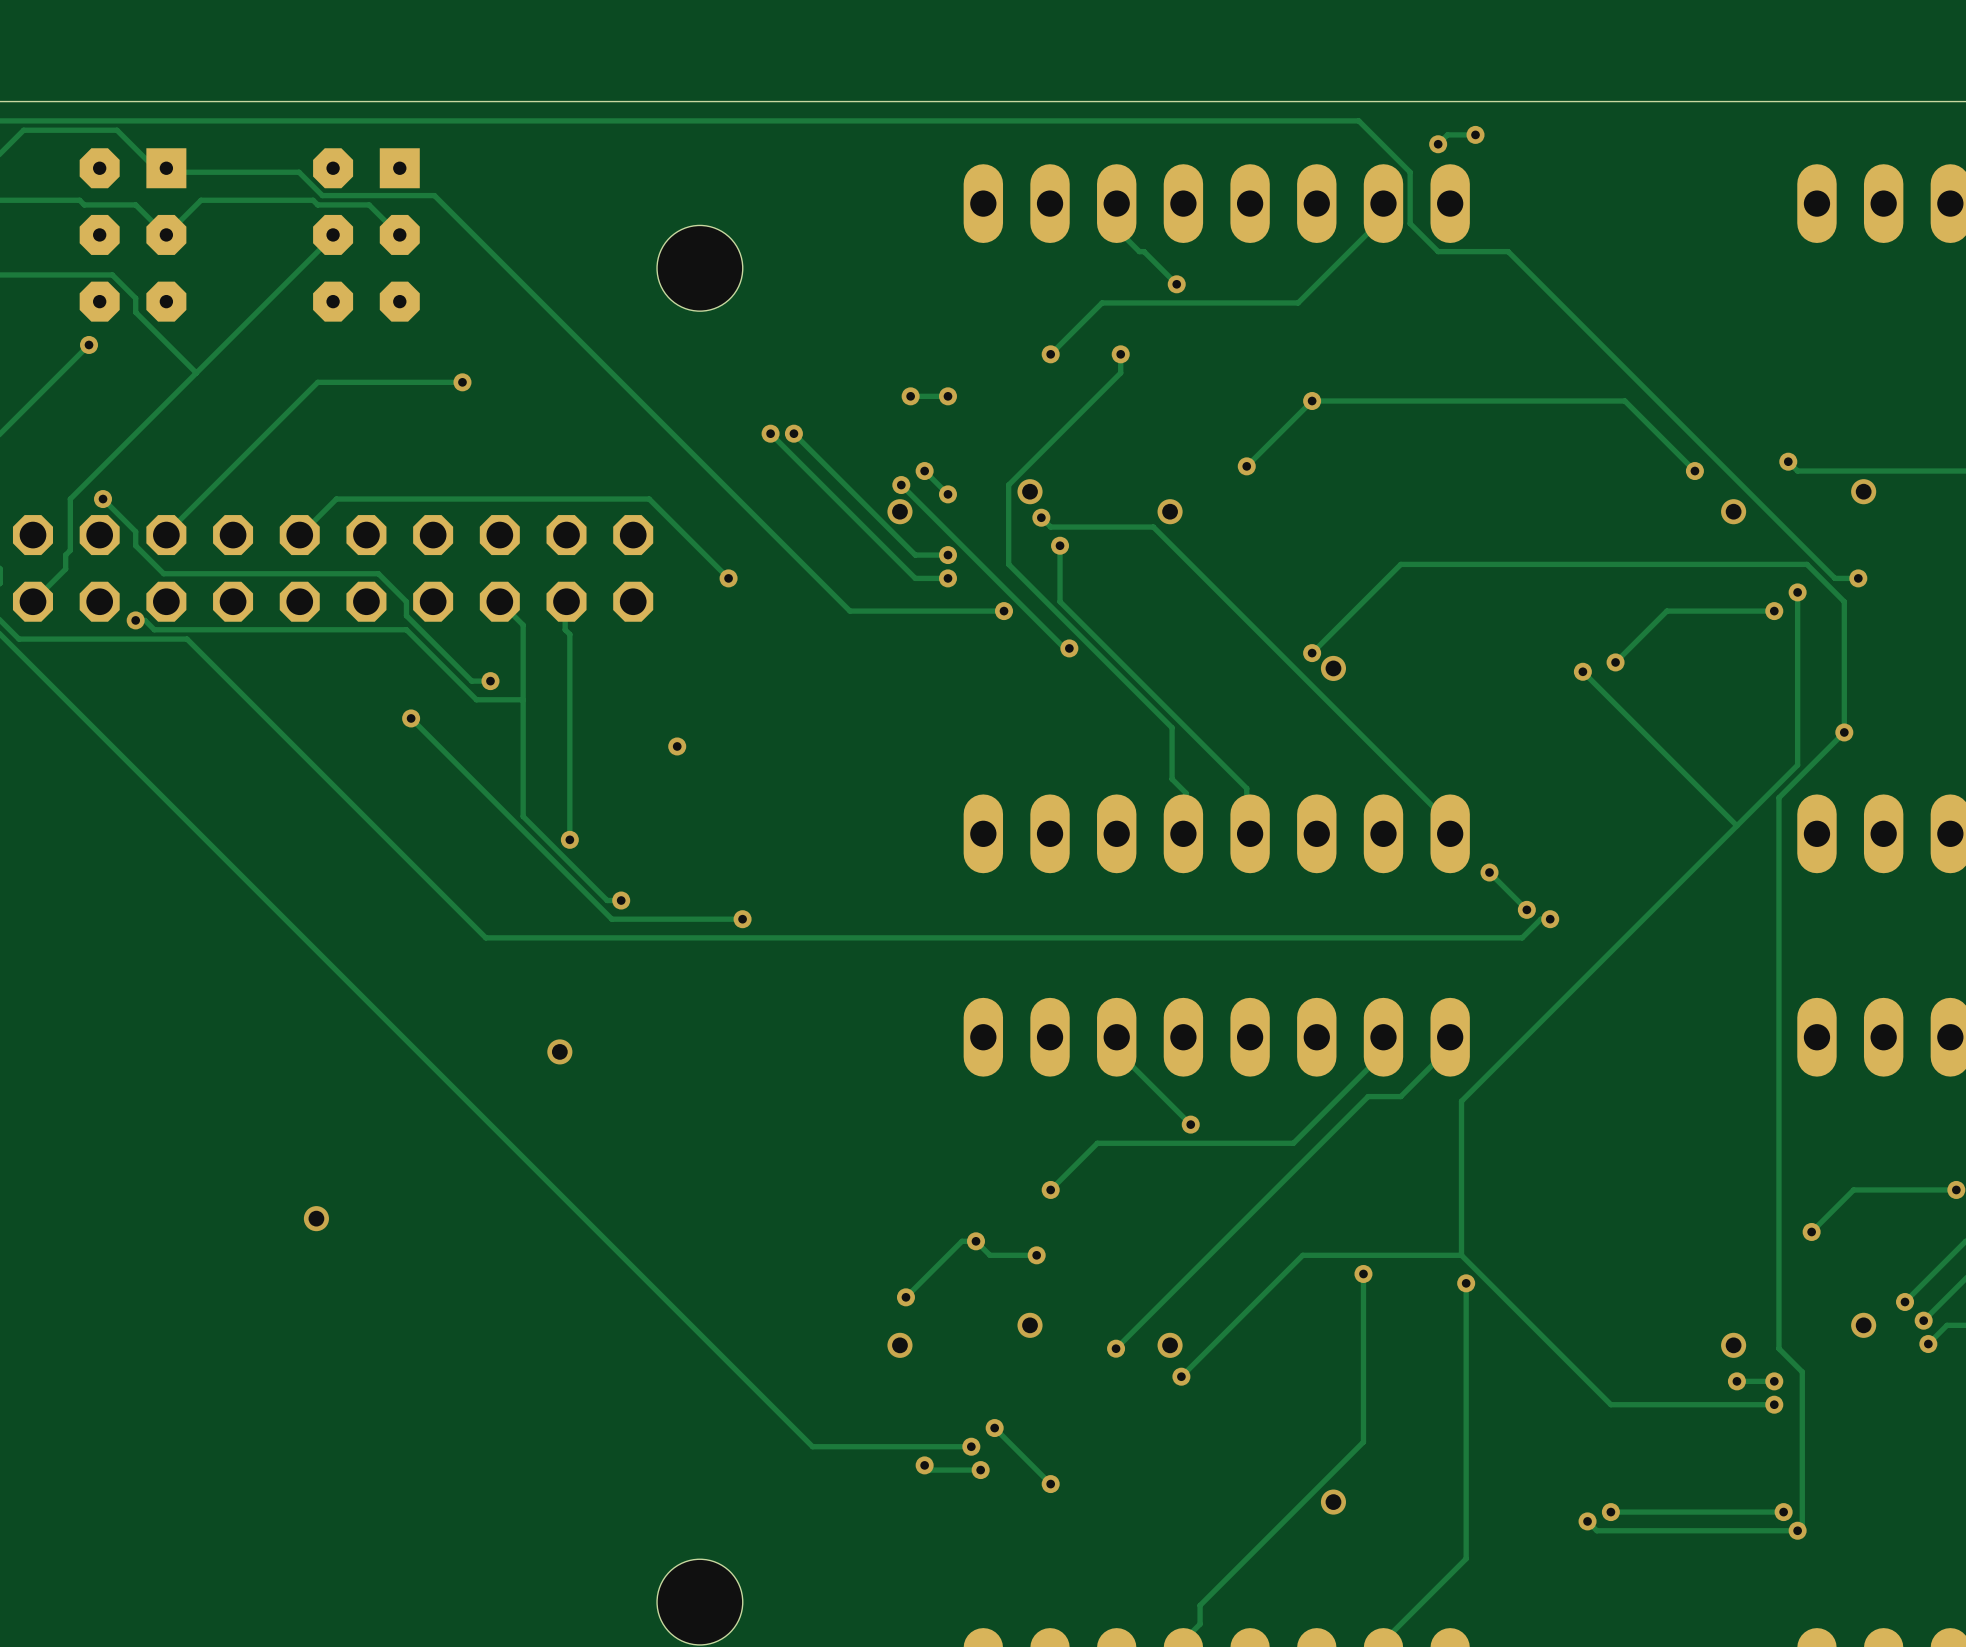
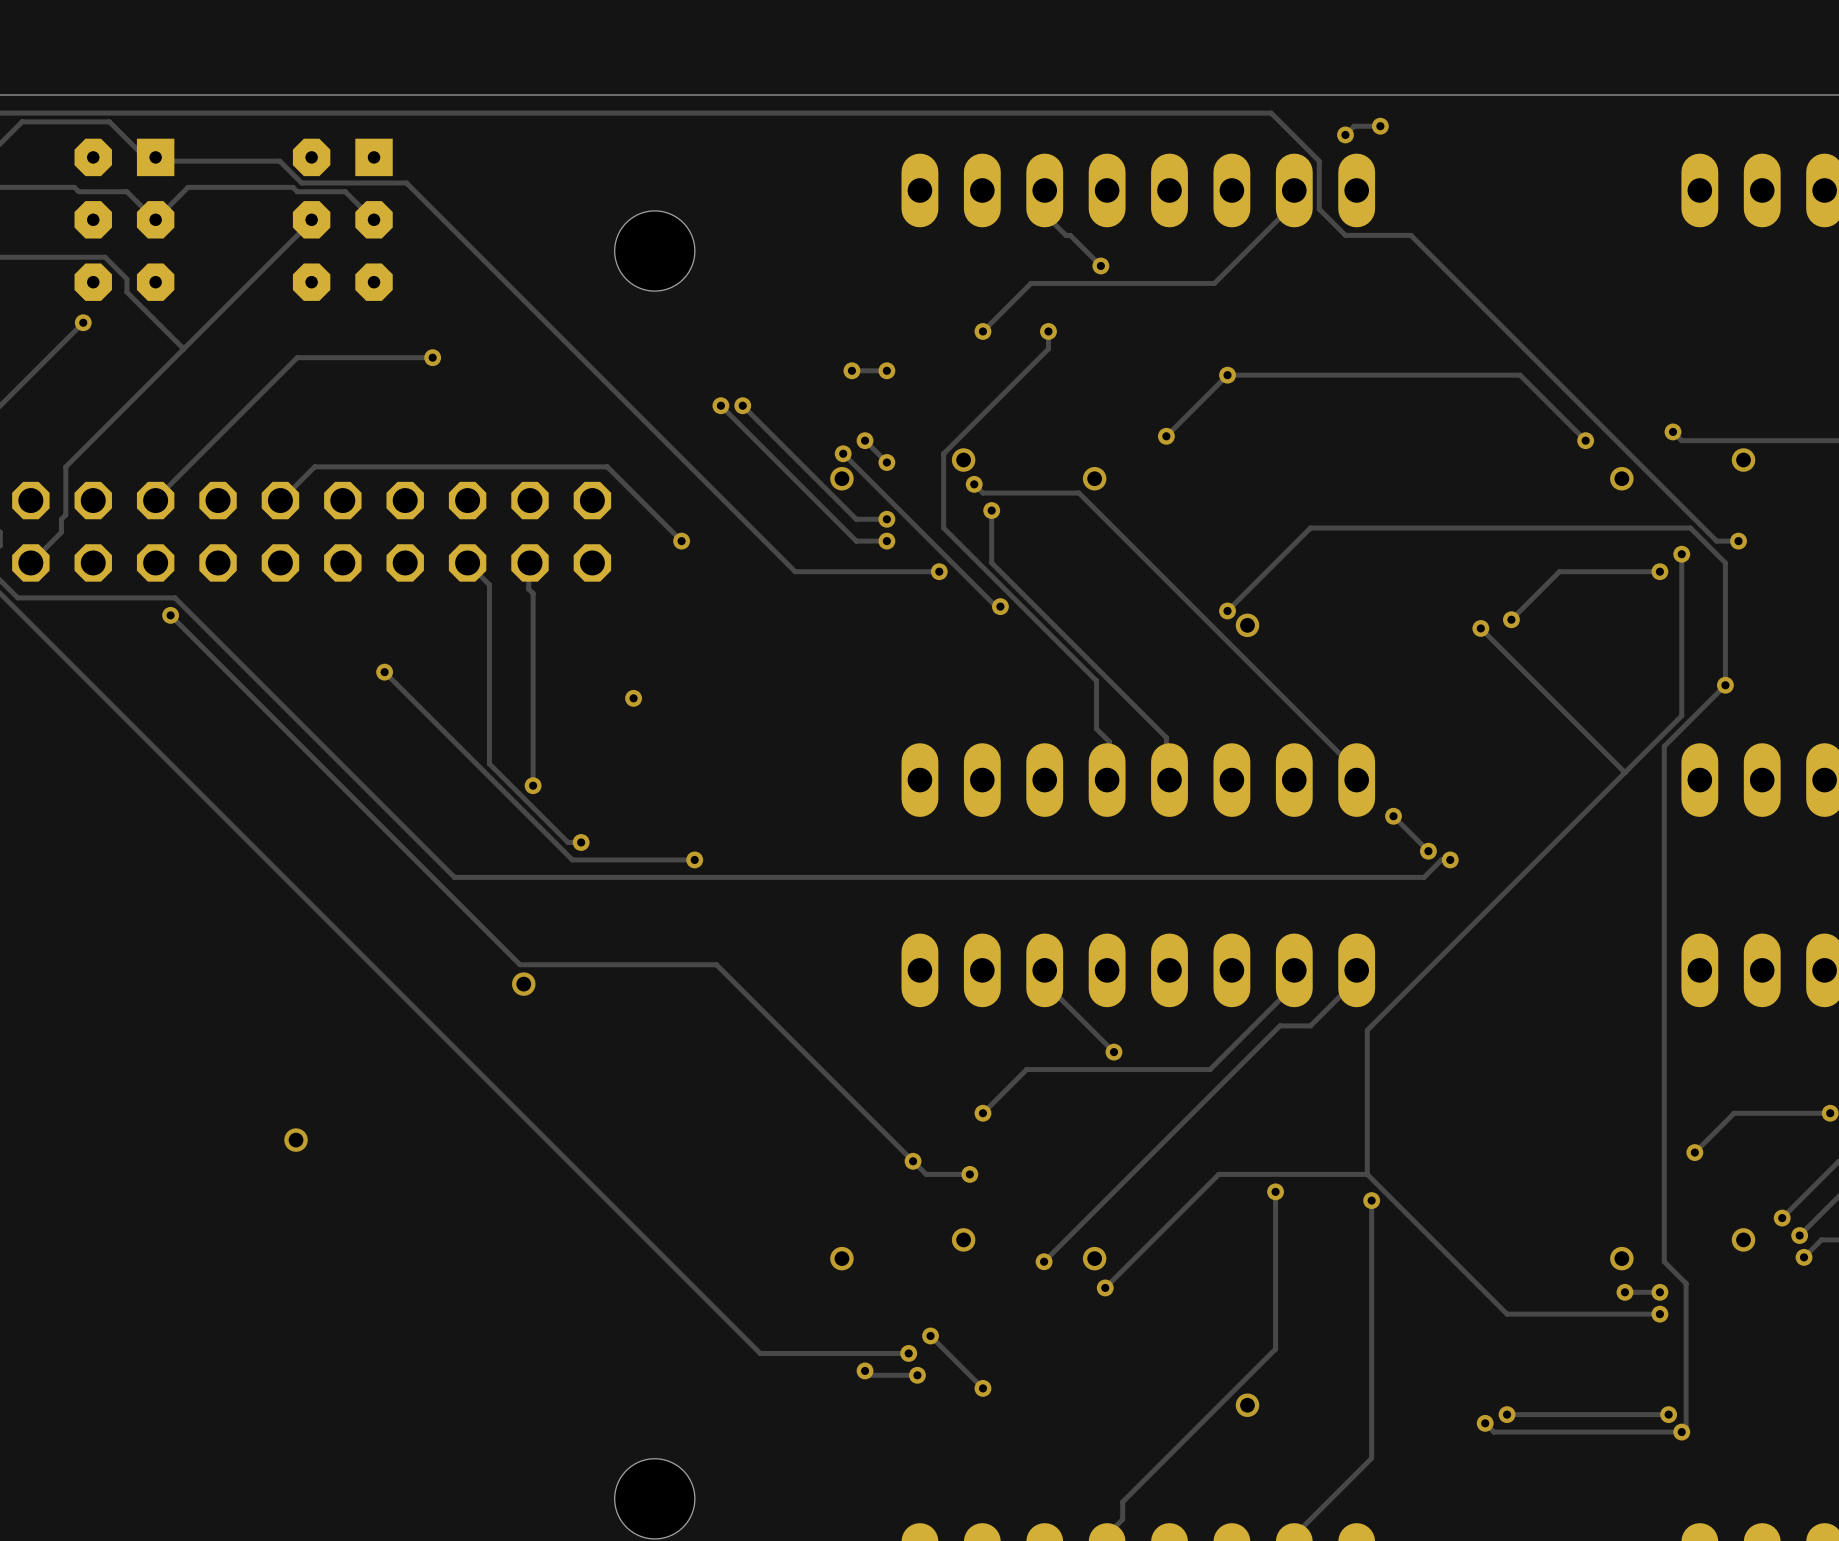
track: (103, 499) (135, 531) (135, 545) (163, 573) (378, 573) (406, 601) (406, 615) (471, 681) (490, 681) -> none
via: (103, 499) -> none
track: (135, 620) (145, 620) (154, 629) (406, 629) (476, 699) (523, 699) -> none
via position: (135, 620) -> (170, 615)
via: (490, 681) -> none
track: (976, 1241) (961, 1241) (905, 1297) -> (913, 1161) (716, 964) (520, 964) (170, 615)
via: (905, 1297) -> none

